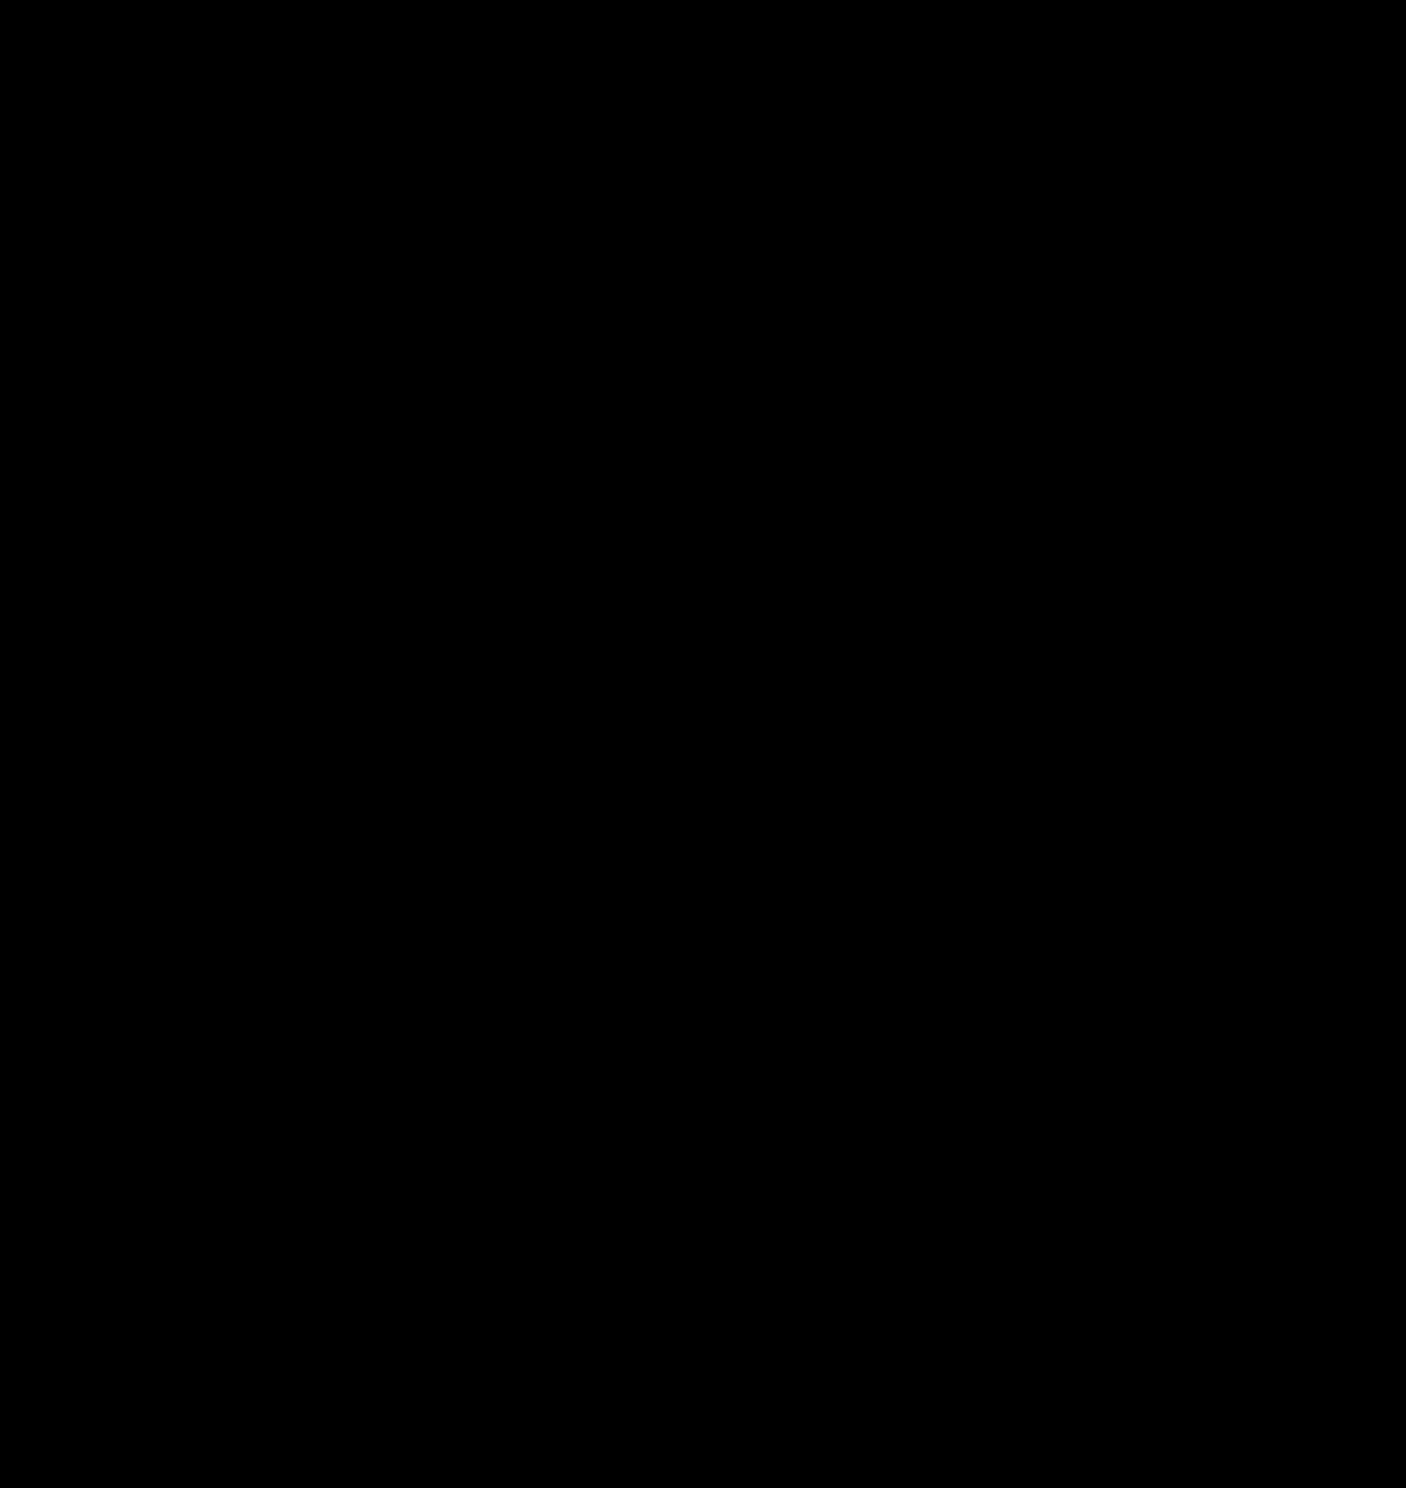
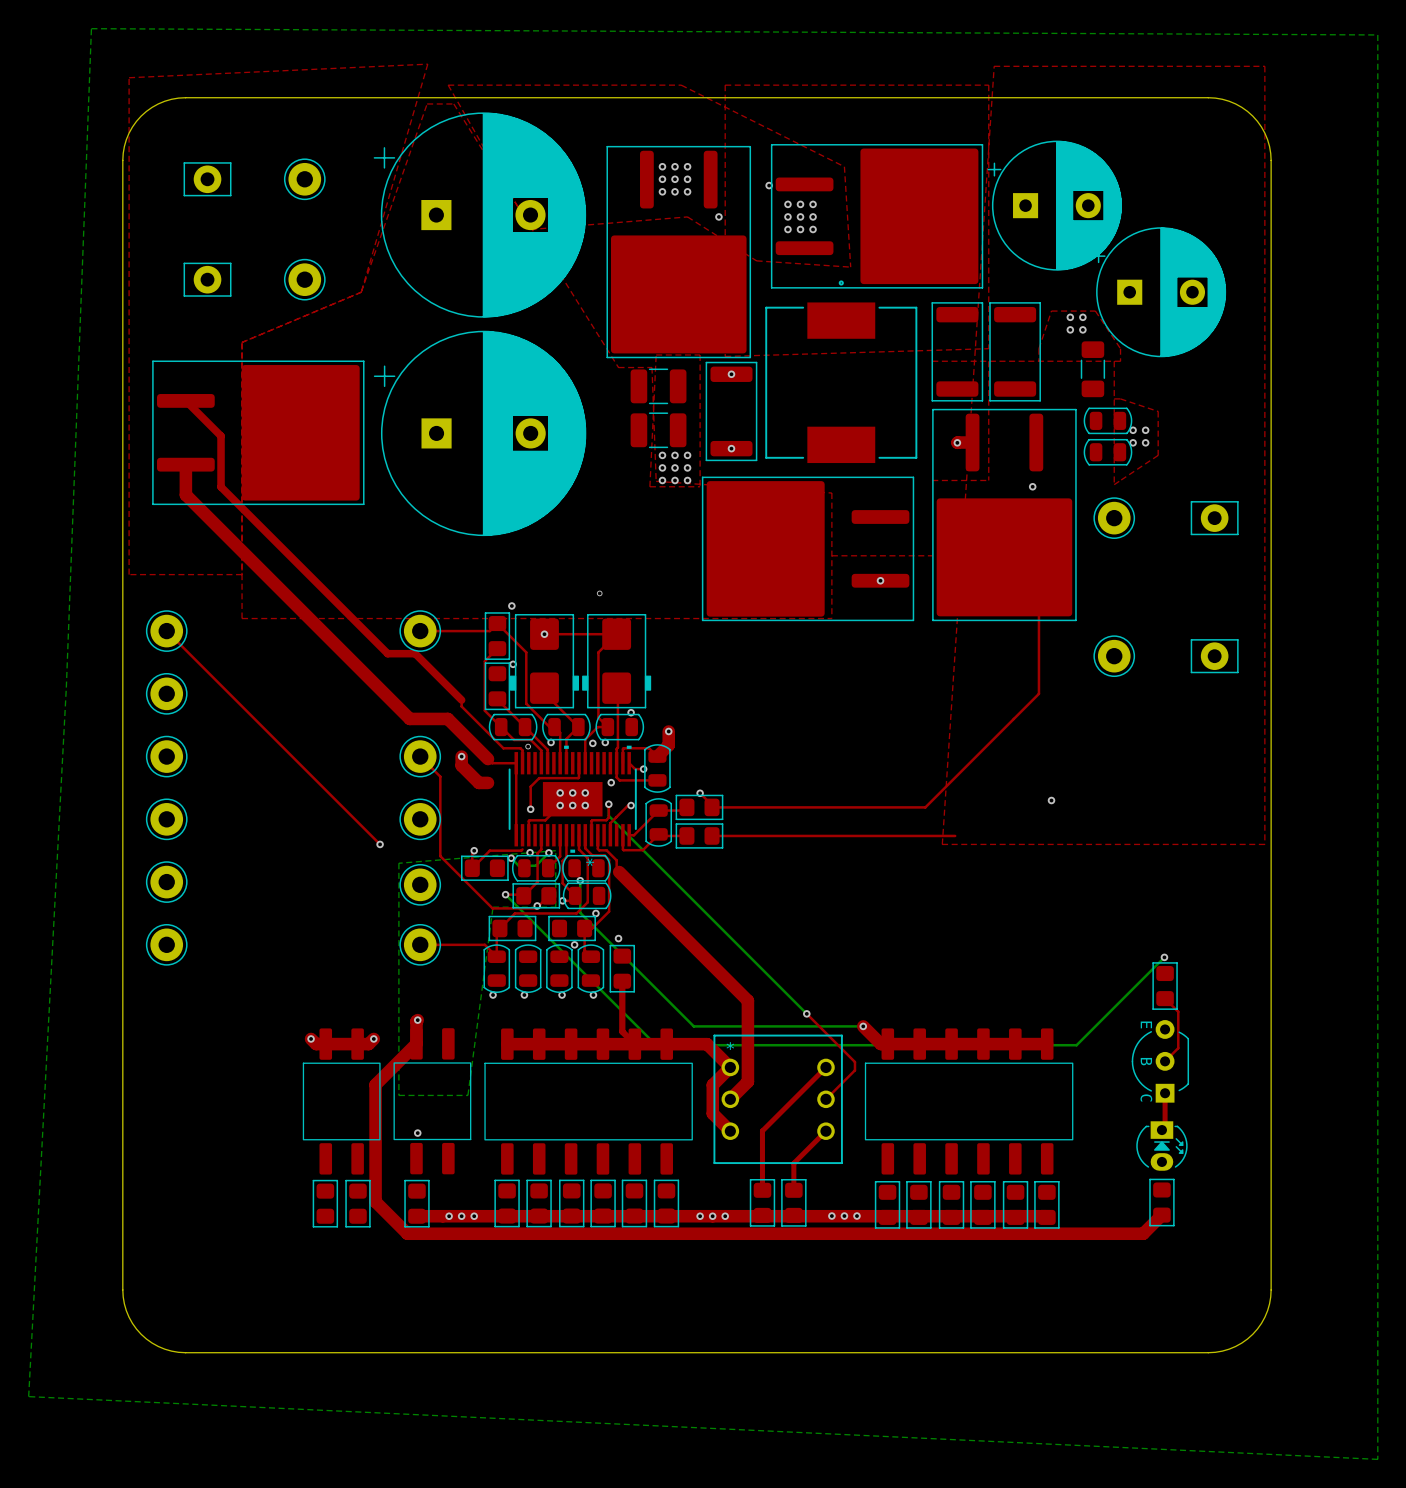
bottom zone outline: none -> (91, 28) (1377, 34) (1377, 1459) (28, 1396) (66, 687) (91, 28)
top zone outline: none -> (994, 66) (1264, 66) (1264, 844) (942, 844) (994, 66)
top zone outline: none -> (448, 85) (681, 85) (844, 166) (850, 267) (756, 260) (687, 216) (530, 229) (448, 85)
top zone outline: none -> (725, 85) (988, 85) (988, 348) (725, 356) (725, 85)
board edge: none -> (185, 97) (1208, 97) (1222, 99) (1235, 103) (1247, 111) (1257, 121) (1267, 139) (1271, 160) (1271, 1289) (1269, 1303) (1264, 1317) (1257, 1329) (1247, 1339) (1229, 1349) (1208, 1352) (185, 1352) (171, 1351) (158, 1346) (146, 1339) (136, 1329) (126, 1310) (122, 1289) (122, 160) (124, 146) (129, 133) (141, 116) (158, 103) (171, 99) (185, 97)
via: none -> (662, 166)
via: none -> (675, 166)
via: none -> (687, 166)
part: none -> (207, 179)
part: none -> (304, 179)
via: none -> (662, 179)
via: none -> (675, 179)
via: none -> (687, 179)
via: none -> (769, 185)
via: none -> (662, 191)
via: none -> (675, 191)
via: none -> (687, 191)
via: none -> (787, 204)
via: none -> (800, 204)
via: none -> (813, 204)
part: none -> (1054, 205)
part: none -> (479, 215)
via: none -> (718, 216)
via: none -> (787, 216)
via: none -> (800, 216)
via: none -> (813, 216)
part: none -> (877, 216)
via: none -> (787, 229)
via: none -> (800, 229)
via: none -> (813, 229)
part: none -> (678, 252)
part: none -> (207, 279)
part: none -> (304, 279)
top zone outline: none -> (361, 292) (242, 342) (242, 618) (831, 618) (831, 493) (656, 481) (652, 367) (618, 367) (453, 103) (427, 103) (361, 292)
top zone outline: none -> (361, 292) (427, 64) (129, 77) (129, 574) (242, 574)
part: none -> (1158, 292)
via: none -> (1070, 317)
via: none -> (1082, 317)
via: none -> (1070, 329)
via: none -> (1082, 329)
part: none -> (957, 351)
part: none -> (1015, 351)
top zone outline: none -> (656, 354) (700, 354) (700, 486) (649, 486) (656, 354)
top zone outline: none -> (932, 361) (1120, 361) (1120, 348) (1095, 311) (1051, 311) (1038, 348) (1038, 361)
top zone outline: none -> (988, 361) (988, 480) (932, 480)
top zone outline: none -> (1114, 361) (1114, 484) (1158, 455) (1158, 411) (1120, 398) (1114, 398)
part: none -> (1092, 369)
part: none -> (841, 371)
via: none -> (731, 374)
part: none -> (658, 386)
top track: none -> (185, 400) (221, 436) (221, 487) (387, 653) (415, 653) (461, 700) (461, 706) (503, 748) (520, 748) (522, 750) (522, 763)
part: none -> (731, 411)
part: none -> (1107, 420)
part: none -> (658, 430)
via: none -> (1133, 430)
via: none -> (1145, 430)
part: none -> (258, 432)
part: none -> (480, 433)
via: none -> (957, 442)
top track: none -> (972, 442) (957, 442)
via: none -> (1133, 442)
via: none -> (1145, 442)
via: none -> (731, 448)
part: none -> (1107, 452)
via: none -> (662, 455)
via: none -> (675, 455)
via: none -> (687, 455)
top track: none -> (185, 464) (185, 494) (409, 718) (447, 718) (492, 763) (516, 763) (516, 835)
via: none -> (662, 467)
via: none -> (675, 467)
via: none -> (687, 467)
via: none -> (662, 480)
via: none -> (675, 480)
via: none -> (687, 480)
via: none -> (1032, 486)
part: none -> (1004, 514)
part: none -> (1114, 518)
part: none -> (1214, 518)
part: none -> (808, 548)
top zone outline: none -> (831, 555) (932, 555)
via: none -> (880, 580)
top track: none -> (1038, 587) (1038, 693) (925, 807) (712, 807) (700, 793)
via: none -> (599, 593)
via: none -> (511, 605)
top track: none -> (166, 631) (380, 844)
part: none -> (166, 631)
top track: none -> (420, 631) (489, 631) (497, 623) (526, 652) (526, 703) (549, 727) (554, 727) (560, 732) (560, 763)
part: none -> (420, 631)
top track: none -> (544, 634) (616, 634) (598, 652) (598, 717) (607, 727) (597, 727) (585, 739) (585, 763)
via: none -> (544, 634)
part: none -> (497, 636)
top track: none -> (497, 648) (484, 661) (484, 710) (514, 739) (530, 739) (541, 750) (541, 763)
part: none -> (1114, 656)
part: none -> (1214, 656)
part: none -> (544, 661)
part: none -> (616, 661)
via: none -> (513, 664)
part: none -> (497, 686)
top track: none -> (544, 688) (544, 693) (578, 727) (566, 739) (566, 763)
top track: none -> (616, 688) (616, 777) (619, 780) (657, 780)
part: none -> (166, 693)
top track: none -> (497, 698) (547, 749) (547, 763)
via: none -> (631, 712)
part: none -> (513, 727)
part: none -> (566, 727)
part: none -> (619, 727)
top track: none -> (668, 731) (668, 745) (657, 756) (649, 748) (623, 748) (622, 763)
via: none -> (668, 731)
via: none -> (551, 742)
via: none -> (605, 742)
via: none -> (592, 743)
via: none -> (528, 746)
part: none -> (166, 756)
top track: none -> (420, 756) (440, 776) (440, 856) (492, 908) (536, 908) (548, 895)
part: none -> (420, 756)
top track: none -> (461, 756) (461, 765) (478, 782) (488, 782)
via: none -> (461, 756)
top track: none -> (579, 763) (578, 778) (539, 778) (530, 786) (530, 809)
top track: none -> (629, 763) (635, 769) (643, 769)
part: none -> (657, 768)
via: none -> (643, 769)
via: none -> (611, 782)
via: none -> (560, 792)
via: none -> (572, 792)
via: none -> (585, 792)
via: none -> (700, 793)
part: none -> (572, 799)
via: none -> (1051, 800)
top track: none -> (608, 804) (608, 817) (606, 820) (591, 821) (591, 835)
bottom track: none -> (608, 804) (608, 815) (806, 1013)
via: none -> (608, 804)
top track: none -> (560, 805) (545, 820) (529, 820) (528, 835)
via: none -> (560, 805)
via: none -> (572, 805)
via: none -> (585, 805)
top track: none -> (631, 805) (628, 805) (610, 823) (610, 835)
via: none -> (631, 805)
top track: none -> (686, 807) (683, 810) (658, 810) (633, 835) (629, 835)
part: none -> (699, 807)
via: none -> (530, 809)
part: none -> (166, 819)
part: none -> (420, 819)
part: none -> (658, 822)
top track: none -> (541, 835) (541, 849) (537, 853) (537, 882) (523, 895) (505, 894)
top track: none -> (560, 835) (560, 856) (548, 868)
top track: none -> (566, 835) (566, 857) (562, 860) (562, 883) (575, 895) (570, 900) (562, 900)
top track: none -> (579, 835) (579, 849) (587, 858) (587, 902) (576, 913) (514, 913) (496, 932) (496, 956) (484, 944) (420, 944)
top track: none -> (585, 835) (585, 848) (592, 855) (604, 855) (609, 859) (609, 911) (592, 928) (584, 928) (584, 950) (590, 956)
top track: none -> (597, 835) (597, 848) (606, 850) (616, 860) (616, 872)
top track: none -> (622, 835) (623, 850) (642, 850) (658, 834) (686, 835)
part: none -> (699, 835)
top track: none -> (955, 835) (712, 835) (712, 838)
via: none -> (380, 844)
top track: none -> (522, 849) (489, 850) (472, 868) (472, 852) (474, 850)
via: none -> (474, 850)
bottom zone outline: none -> (555, 850) (555, 907) (493, 907) (467, 1095) (398, 1095) (398, 863) (555, 850)
via: none -> (530, 852)
bottom track: none -> (548, 852) (536, 865) (518, 865) (511, 858)
via: none -> (548, 852)
via: none -> (511, 858)
part: none -> (484, 868)
part: none -> (536, 868)
part: none -> (586, 868)
top track: none -> (619, 872) (747, 1000) (747, 1081) (730, 1099)
bottom track: none -> (580, 880) (580, 912) (693, 1026) (863, 1026)
via: none -> (580, 880)
part: none -> (166, 882)
part: none -> (420, 884)
bottom track: none -> (505, 894) (656, 1045) (1076, 1045) (1164, 957)
via: none -> (505, 894)
part: none -> (536, 895)
part: none -> (587, 895)
via: none -> (562, 900)
via: none -> (537, 905)
via: none -> (595, 913)
part: none -> (512, 928)
part: none -> (572, 928)
via: none -> (618, 938)
part: none -> (166, 944)
part: none -> (420, 944)
via: none -> (574, 944)
via: none -> (1164, 957)
part: none -> (496, 968)
part: none -> (528, 968)
part: none -> (559, 968)
part: none -> (590, 968)
part: none -> (622, 968)
top track: none -> (622, 981) (622, 1031) (634, 1044)
part: none -> (1165, 986)
via: none -> (493, 995)
via: none -> (524, 995)
via: none -> (562, 995)
via: none -> (593, 995)
top track: none -> (1165, 998) (1178, 1011) (1178, 1048) (1165, 1061)
top track: none -> (806, 1013) (854, 1062) (854, 1070) (825, 1099)
via: none -> (806, 1013)
top track: none -> (417, 1020) (416, 1043) (375, 1084) (375, 1201) (407, 1233) (1143, 1233) (1161, 1215)
via: none -> (417, 1020)
top track: none -> (863, 1026) (880, 1044) (1047, 1044)
via: none -> (863, 1026)
top track: none -> (311, 1038) (316, 1044) (368, 1044) (373, 1038)
via: none -> (311, 1038)
via: none -> (373, 1038)
top track: none -> (507, 1044) (707, 1044) (730, 1067) (712, 1085) (712, 1113) (730, 1131)
part: none -> (1160, 1061)
top track: none -> (825, 1067) (762, 1130) (762, 1190)
top track: none -> (1165, 1093) (1165, 1126) (1161, 1130)
part: none -> (778, 1099)
part: none -> (341, 1101)
part: none -> (432, 1101)
part: none -> (588, 1101)
part: none -> (969, 1101)
top track: none -> (825, 1131) (793, 1163) (793, 1190)
via: none -> (417, 1133)
part: none -> (1161, 1146)
part: none -> (762, 1202)
part: none -> (793, 1202)
part: none -> (1161, 1202)
part: none -> (325, 1203)
part: none -> (357, 1203)
part: none -> (416, 1203)
part: none -> (507, 1203)
part: none -> (539, 1203)
part: none -> (571, 1203)
part: none -> (603, 1203)
part: none -> (634, 1203)
part: none -> (666, 1203)
part: none -> (887, 1204)
part: none -> (918, 1204)
part: none -> (951, 1204)
part: none -> (982, 1204)
part: none -> (1015, 1204)
part: none -> (1046, 1204)
via: none -> (449, 1216)
via: none -> (461, 1216)
via: none -> (474, 1216)
top track: none -> (507, 1216) (886, 1216) (887, 1217) (1046, 1217) (1045, 1216) (416, 1216)
via: none -> (700, 1216)
via: none -> (712, 1216)
via: none -> (725, 1216)
via: none -> (831, 1216)
via: none -> (844, 1216)
via: none -> (856, 1216)

